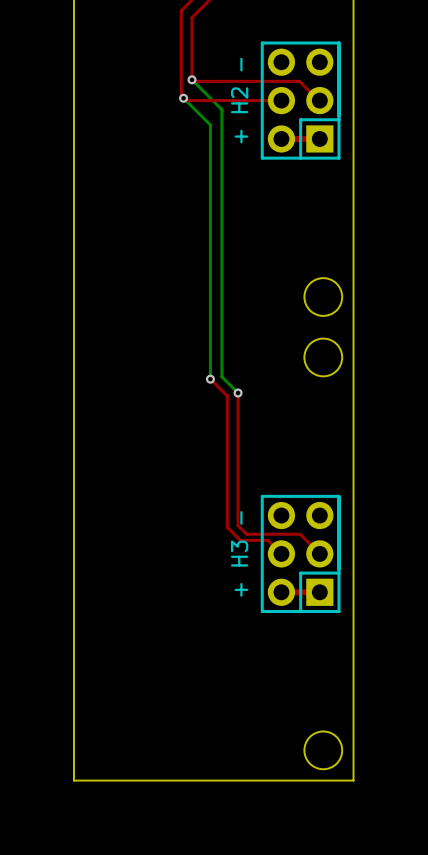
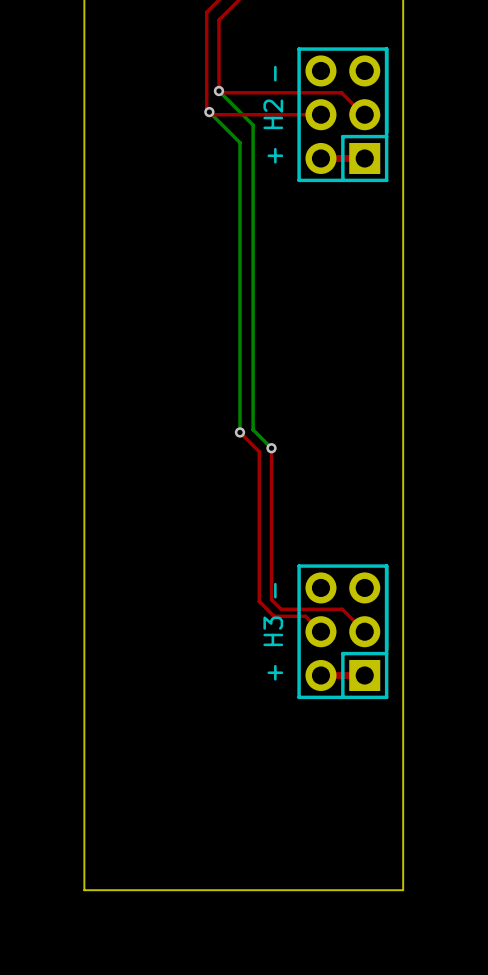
round board edge: [304, 277, 343, 317] -> none
round board edge: [304, 338, 343, 377] -> none
round board edge: [304, 731, 343, 770] -> none

